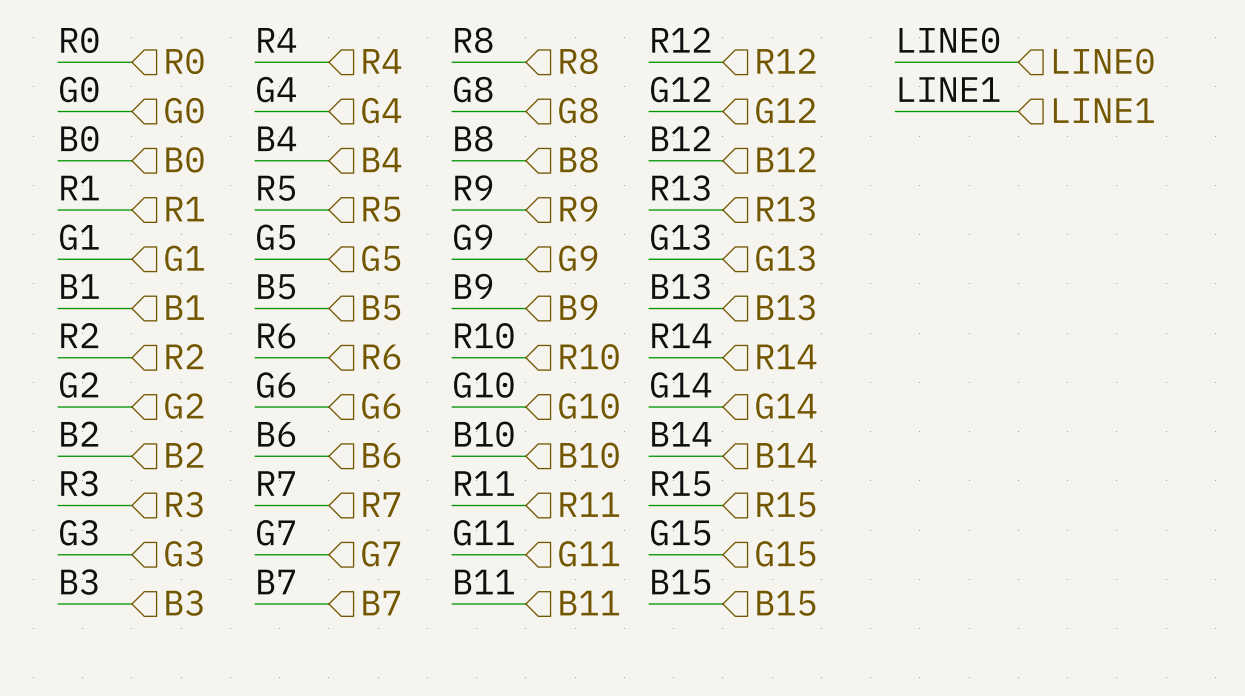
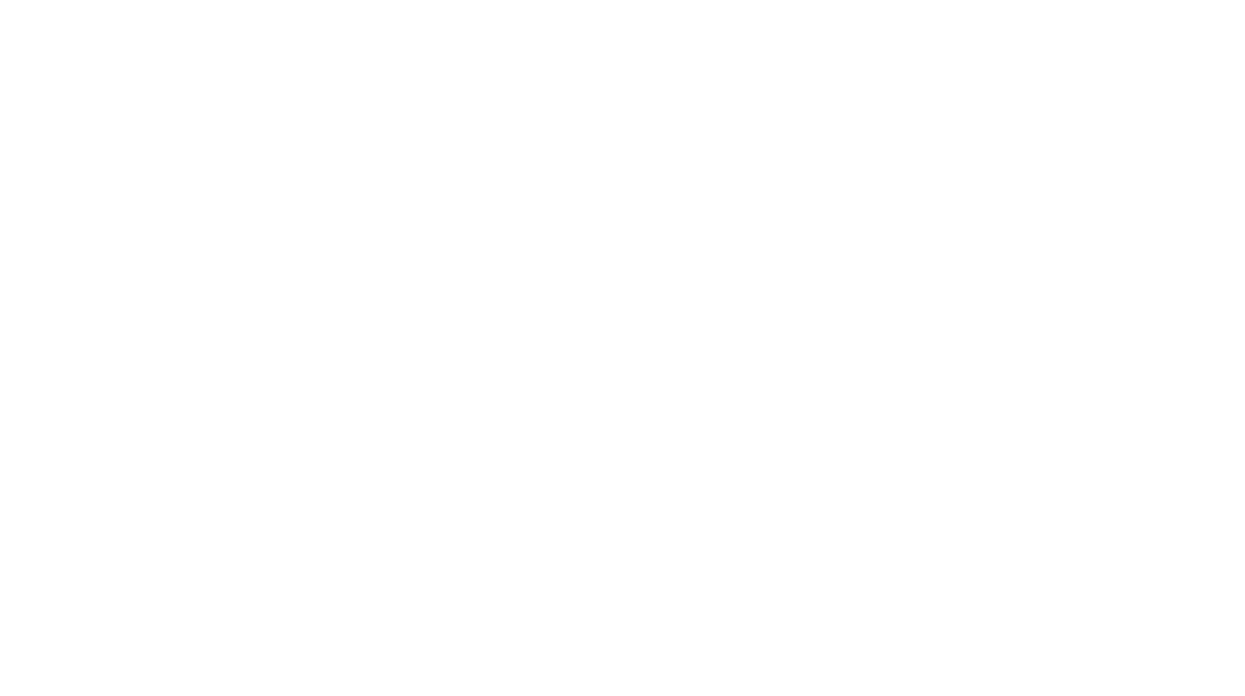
label: R0 (79, 40) -> none
label: R4 (277, 40) -> none
label: R8 (473, 40) -> none
label: R12 (681, 40) -> none
label: LINE0 (949, 40) -> none
hierarchical label: R0 (184, 61) -> none
hierarchical label: R4 (382, 61) -> none
hierarchical label: R8 (578, 61) -> none
hierarchical label: R12 (786, 61) -> none
hierarchical label: LINE0 (1103, 61) -> none
wire: (58, 62) (131, 62) -> none
wire: (255, 62) (328, 62) -> none
wire: (452, 62) (525, 62) -> none
wire: (649, 62) (722, 62) -> none
wire: (895, 62) (1018, 62) -> none
label: G0 (79, 89) -> none
label: G4 (276, 89) -> none
label: G8 (473, 89) -> none
label: G12 (680, 89) -> none
label: LINE1 (949, 89) -> none
hierarchical label: G0 (184, 110) -> none
hierarchical label: G4 (381, 110) -> none
hierarchical label: G8 (578, 110) -> none
hierarchical label: G12 (785, 110) -> none
hierarchical label: LINE1 (1103, 110) -> none
wire: (58, 111) (131, 111) -> none
wire: (255, 111) (328, 111) -> none
wire: (452, 111) (525, 111) -> none
wire: (649, 111) (722, 111) -> none
wire: (895, 111) (1018, 111) -> none
label: B0 (79, 138) -> none
label: B4 (277, 138) -> none
label: B8 (473, 138) -> none
label: B12 (681, 138) -> none
hierarchical label: B0 (184, 159) -> none
hierarchical label: B4 (382, 159) -> none
hierarchical label: B8 (578, 159) -> none
hierarchical label: B12 (786, 159) -> none
wire: (58, 160) (131, 160) -> none
wire: (255, 160) (328, 160) -> none
wire: (452, 160) (525, 160) -> none
wire: (649, 160) (722, 160) -> none
label: R9 (473, 187) -> none
label: R1 (80, 188) -> none
label: R5 (276, 188) -> none
label: R13 (680, 188) -> none
hierarchical label: R9 (578, 208) -> none
hierarchical label: R1 (185, 209) -> none
hierarchical label: R5 (381, 209) -> none
hierarchical label: R13 (786, 209) -> none
wire: (58, 210) (131, 210) -> none
wire: (255, 210) (328, 210) -> none
wire: (452, 210) (525, 210) -> none
wire: (649, 210) (722, 210) -> none
label: G1 (79, 237) -> none
label: G5 (276, 237) -> none
label: G9 (473, 237) -> none
label: G13 (680, 237) -> none
hierarchical label: G1 (184, 258) -> none
hierarchical label: G5 (381, 258) -> none
hierarchical label: G9 (578, 258) -> none
hierarchical label: G13 (785, 258) -> none
wire: (58, 259) (131, 259) -> none
wire: (255, 259) (328, 259) -> none
wire: (452, 259) (525, 259) -> none
wire: (649, 259) (722, 259) -> none
label: B1 (79, 286) -> none
label: B5 (276, 286) -> none
label: B9 (473, 286) -> none
label: B13 (680, 286) -> none
hierarchical label: B1 (185, 307) -> none
hierarchical label: B5 (381, 307) -> none
hierarchical label: B9 (578, 307) -> none
hierarchical label: B13 (786, 307) -> none
wire: (58, 308) (131, 308) -> none
wire: (255, 308) (328, 308) -> none
wire: (452, 308) (525, 308) -> none
wire: (649, 308) (722, 308) -> none
label: R2 (79, 335) -> none
label: R10 (484, 335) -> none
label: R14 (681, 335) -> none
label: R6 (276, 336) -> none
hierarchical label: R2 (184, 356) -> none
hierarchical label: R10 (589, 356) -> none
hierarchical label: R14 (786, 356) -> none
wire: (58, 357) (131, 357) -> none
wire: (255, 357) (328, 357) -> none
hierarchical label: R6 (381, 357) -> none
wire: (452, 357) (525, 357) -> none
wire: (649, 357) (722, 357) -> none
label: G2 (79, 385) -> none
label: G6 (276, 385) -> none
label: G10 (483, 385) -> none
label: G14 (681, 385) -> none
hierarchical label: G2 (184, 406) -> none
hierarchical label: G6 (381, 406) -> none
hierarchical label: G10 (588, 406) -> none
hierarchical label: G14 (786, 406) -> none
wire: (58, 407) (131, 407) -> none
wire: (255, 407) (328, 407) -> none
wire: (452, 407) (525, 407) -> none
wire: (649, 407) (722, 407) -> none
label: B2 (79, 434) -> none
label: B6 (276, 434) -> none
label: B10 (484, 434) -> none
label: B14 (681, 434) -> none
hierarchical label: B2 (184, 455) -> none
hierarchical label: B6 (381, 455) -> none
hierarchical label: B10 (589, 455) -> none
hierarchical label: B14 (786, 455) -> none
wire: (58, 456) (131, 456) -> none
wire: (255, 456) (328, 456) -> none
wire: (452, 456) (525, 456) -> none
wire: (649, 456) (722, 456) -> none
label: R3 (79, 483) -> none
label: R7 (276, 483) -> none
label: R11 (484, 483) -> none
label: R15 (681, 483) -> none
hierarchical label: R3 (184, 504) -> none
hierarchical label: R7 (381, 504) -> none
hierarchical label: R11 (589, 504) -> none
hierarchical label: R15 (786, 504) -> none
wire: (58, 505) (131, 505) -> none
wire: (255, 505) (328, 505) -> none
wire: (452, 505) (525, 505) -> none
wire: (649, 505) (722, 505) -> none
label: G3 (78, 532) -> none
label: G7 (276, 532) -> none
label: G11 (483, 532) -> none
label: G15 (680, 532) -> none
hierarchical label: G3 (183, 553) -> none
hierarchical label: G7 (381, 553) -> none
hierarchical label: G11 (589, 553) -> none
hierarchical label: G15 (785, 553) -> none
wire: (58, 554) (131, 554) -> none
wire: (255, 554) (328, 554) -> none
wire: (452, 554) (525, 554) -> none
wire: (649, 554) (722, 554) -> none
label: B3 (79, 582) -> none
label: B7 (276, 582) -> none
label: B11 (484, 582) -> none
label: B15 (681, 582) -> none
hierarchical label: B3 (184, 603) -> none
hierarchical label: B7 (381, 603) -> none
hierarchical label: B11 (589, 603) -> none
hierarchical label: B15 (786, 603) -> none
wire: (58, 604) (131, 604) -> none
wire: (255, 604) (328, 604) -> none
wire: (452, 604) (525, 604) -> none
wire: (649, 604) (722, 604) -> none

